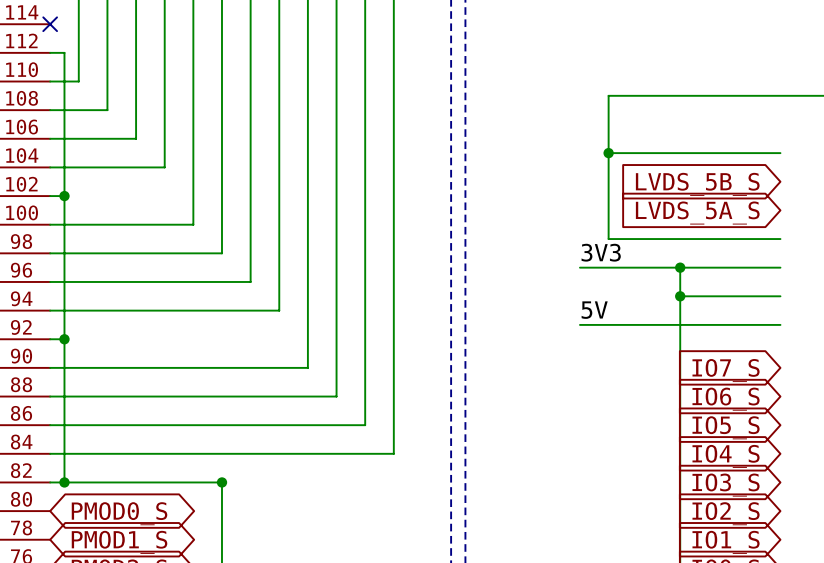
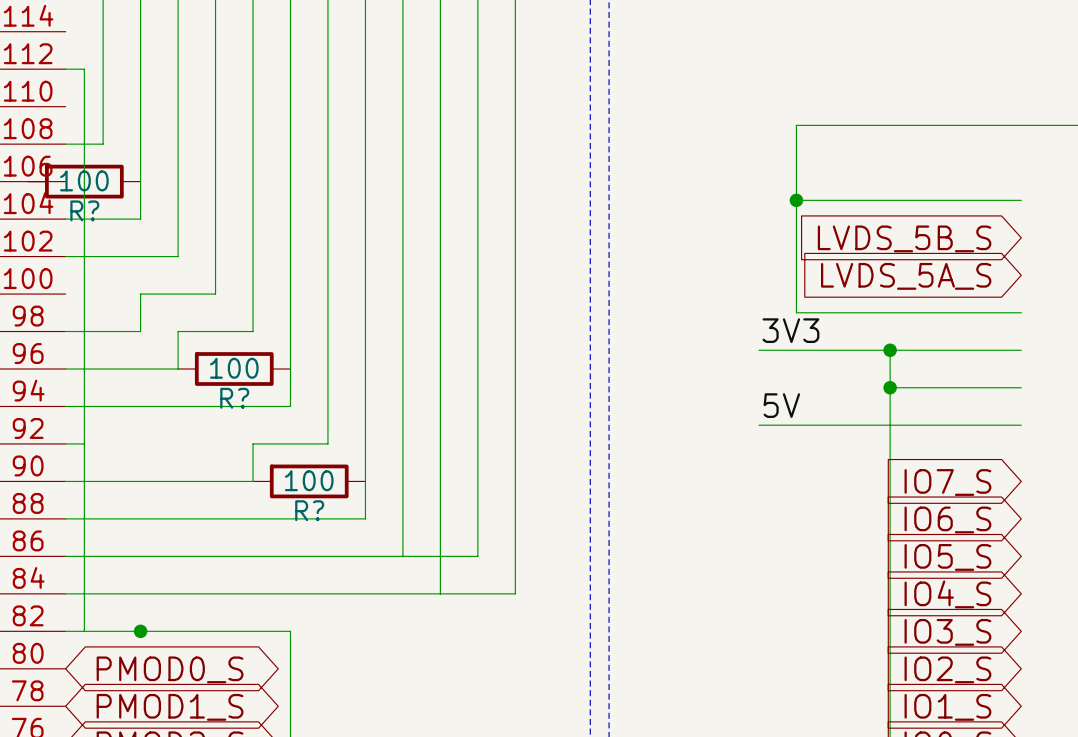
no-connect mark: (50, 24) -> none
wire: (50, 81) (78, 81) -> (103, 144) (103, 106)
wire: (78, 110) (107, 110) -> (140, 219) (140, 144)
wire: (50, 138) (136, 138) -> (84, 256) (178, 256) (178, 181)
R?: none -> 100 (84, 181)
wire: (107, 167) (164, 167) -> none
junction: (64, 196) -> none
wire: (50, 224) (107, 224) -> none
wire: (164, 224) (193, 224) -> (215, 294) (215, 219)
wire: (107, 253) (136, 253) -> (140, 331) (140, 294)
wire: none -> (178, 331) (178, 369)
wire: (193, 253) (221, 253) -> (253, 331) (253, 294)
wire: (136, 281) (250, 281) -> (253, 481) (253, 443) (327, 443) (327, 369)
R?: none -> 100 (234, 369)
wire: (221, 310) (279, 310) -> (290, 406) (290, 331)
wire: none -> (365, 406) (365, 518)
junction: (64, 339) -> none
wire: (193, 367) (307, 367) -> (402, 556) (402, 481)
R?: none -> 100 (309, 481)
wire: (279, 396) (336, 396) -> (440, 593) (440, 518)
junction position: (64, 482) -> (140, 631)
junction: (221, 482) -> none

